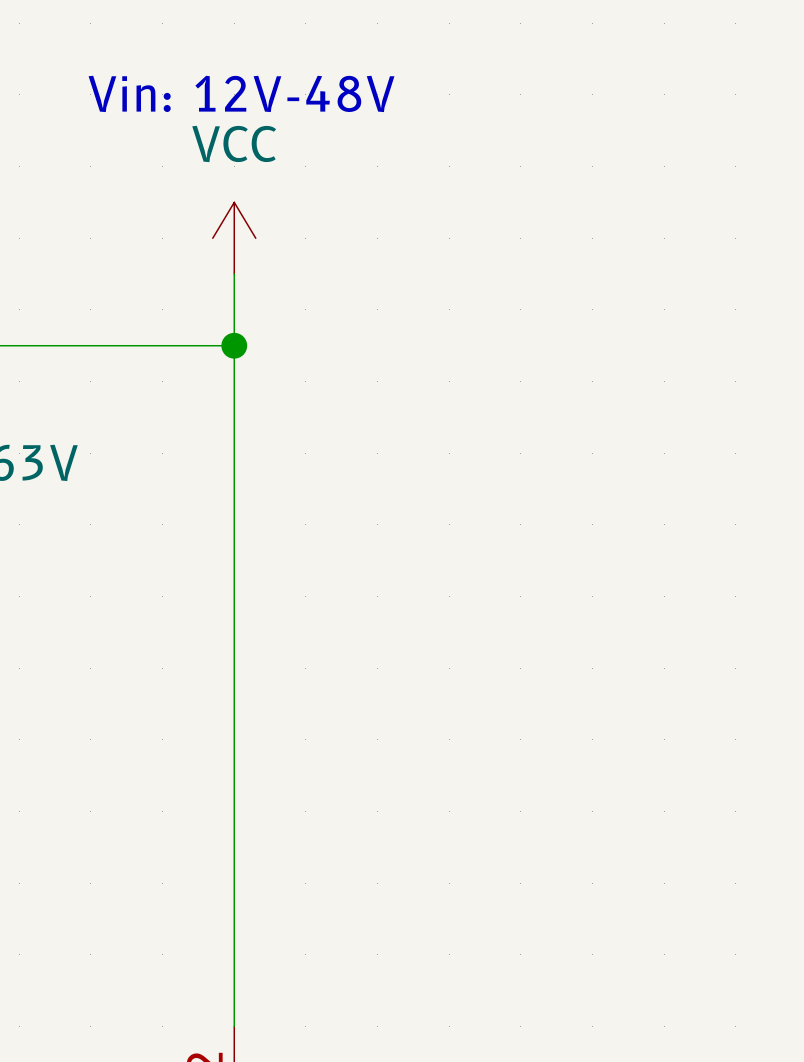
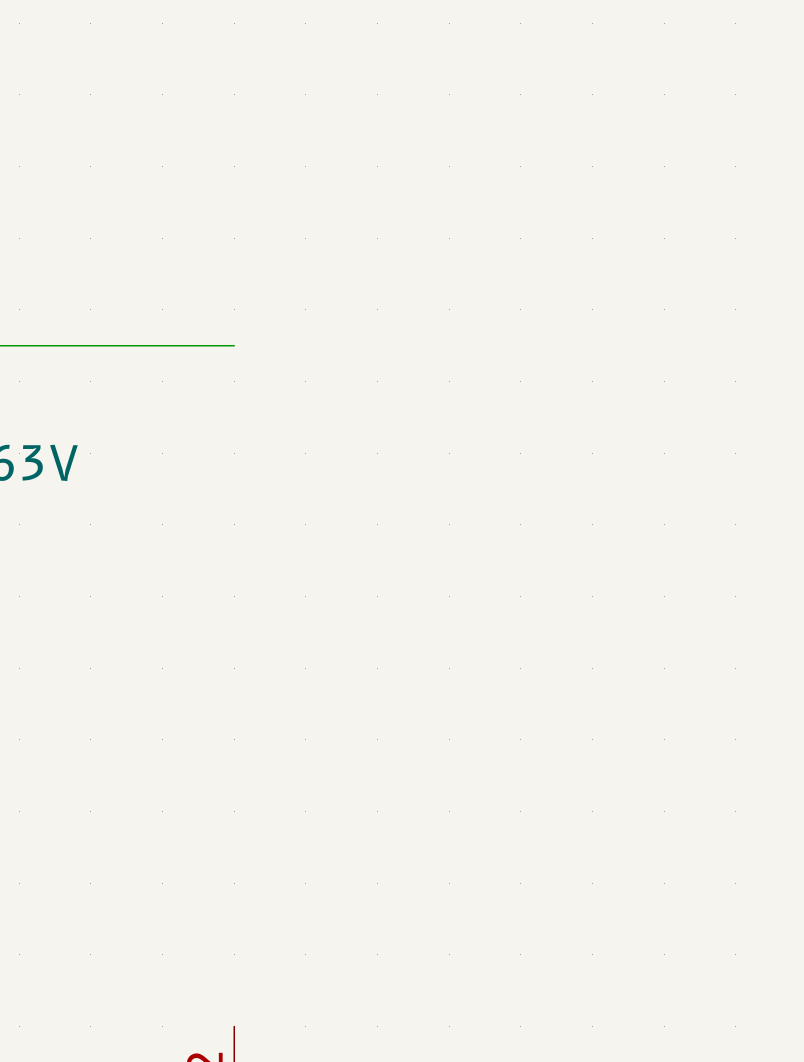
text: Vin: 12V-48V (241, 93) -> none
power symbol: VCC (234, 238) -> none
wire: (234, 274) (234, 1026) -> none
junction: (234, 345) -> none

